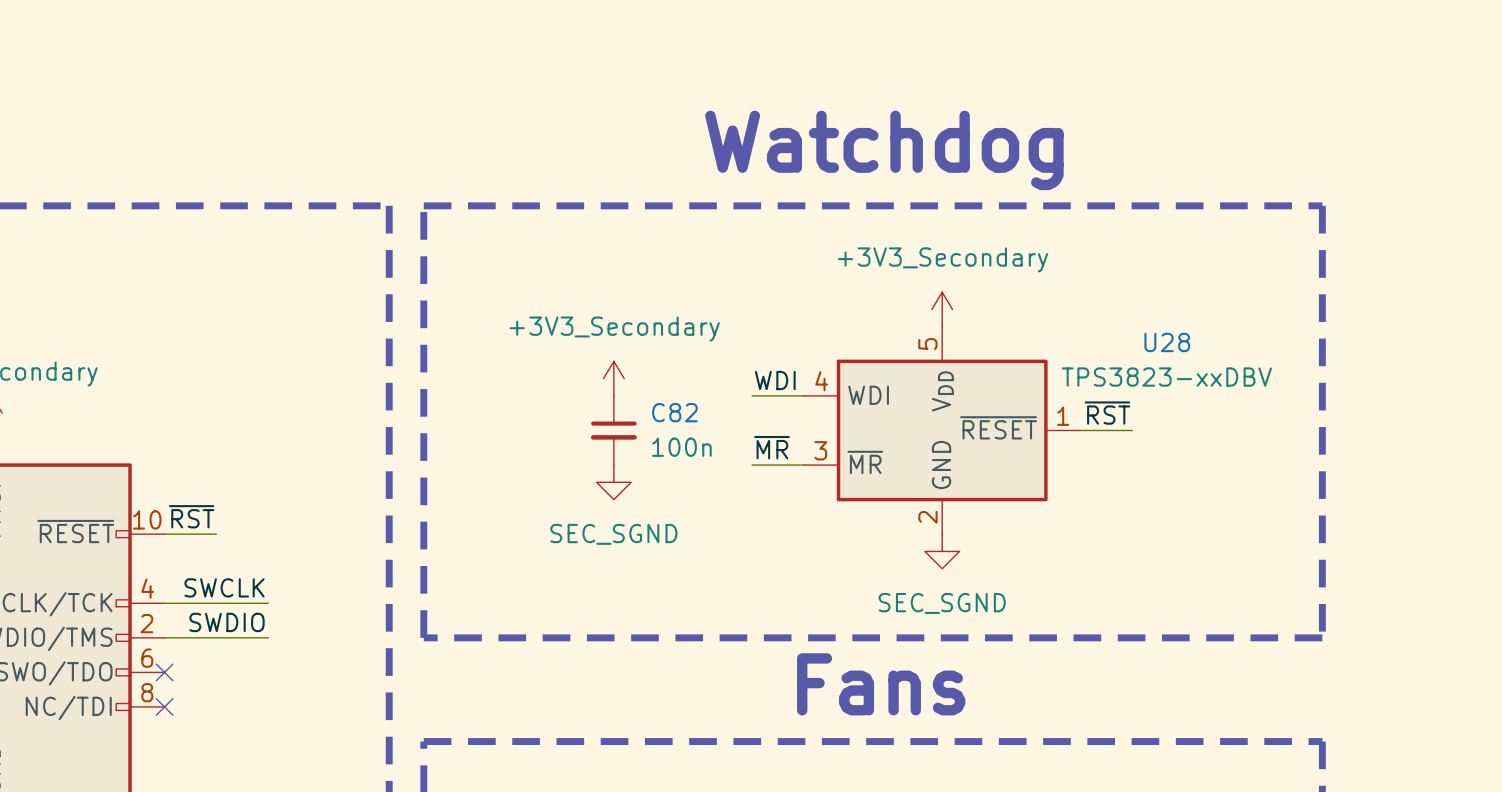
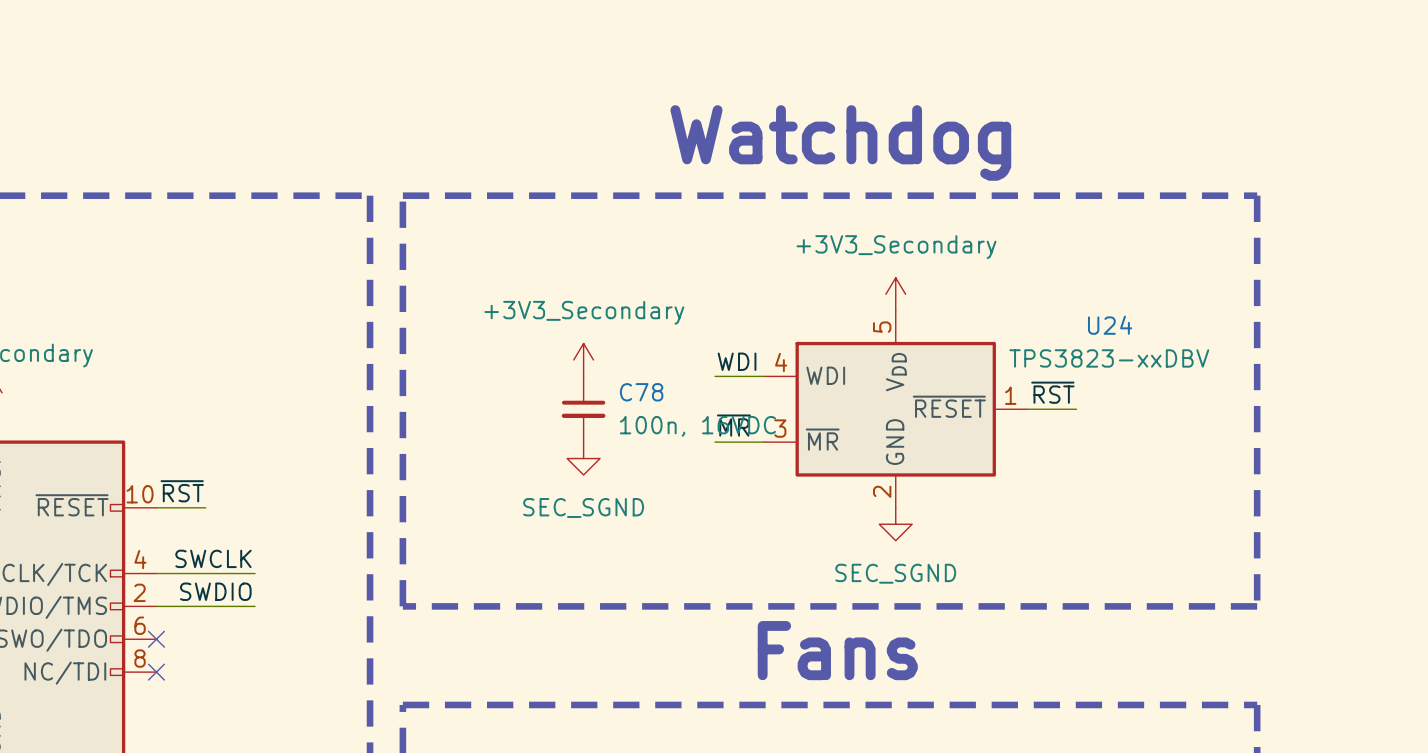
U28 name: U28 (1167, 342) -> U24 (1110, 325)
C82 name: C82 (674, 412) -> C78 (641, 392)
C82 value: 100n (681, 447) -> 100n, 16VDC (697, 426)

